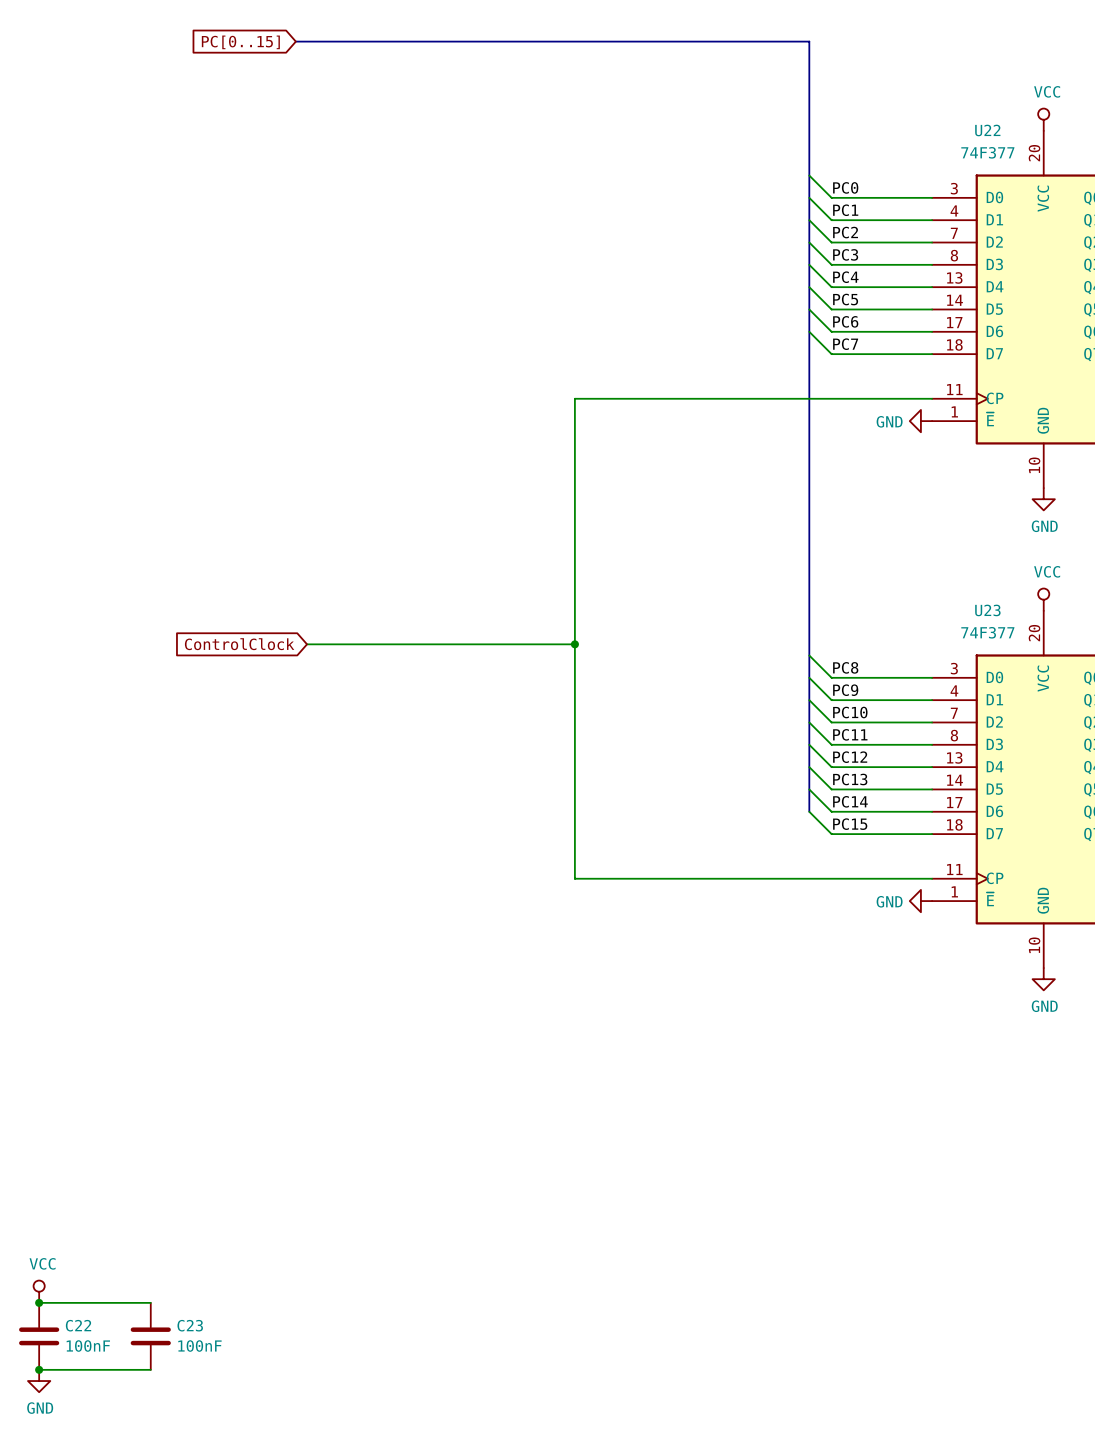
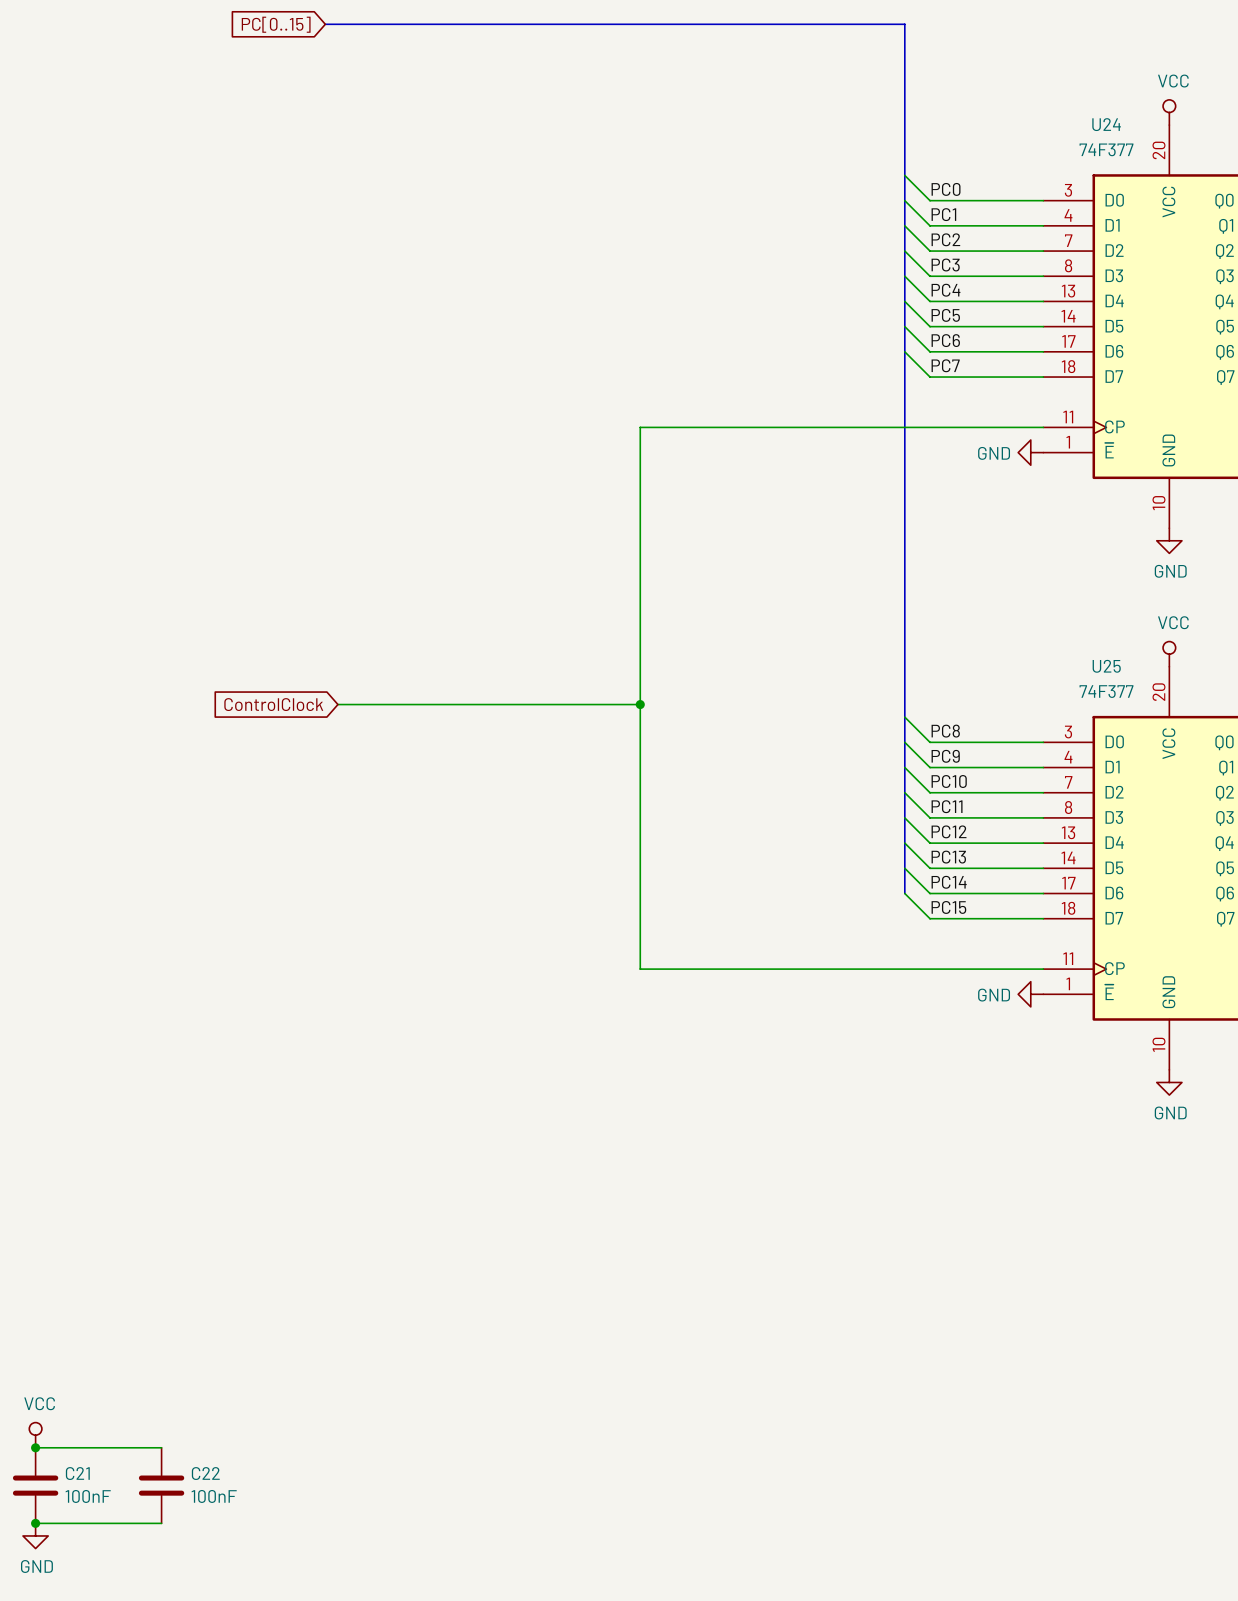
U22 name: U22 (987, 130) -> U24 (1106, 124)
U23 name: U23 (987, 610) -> U25 (1106, 666)
C22 name: C22 (78, 1325) -> C21 (77, 1473)
C23 name: C23 (190, 1325) -> C22 (205, 1473)

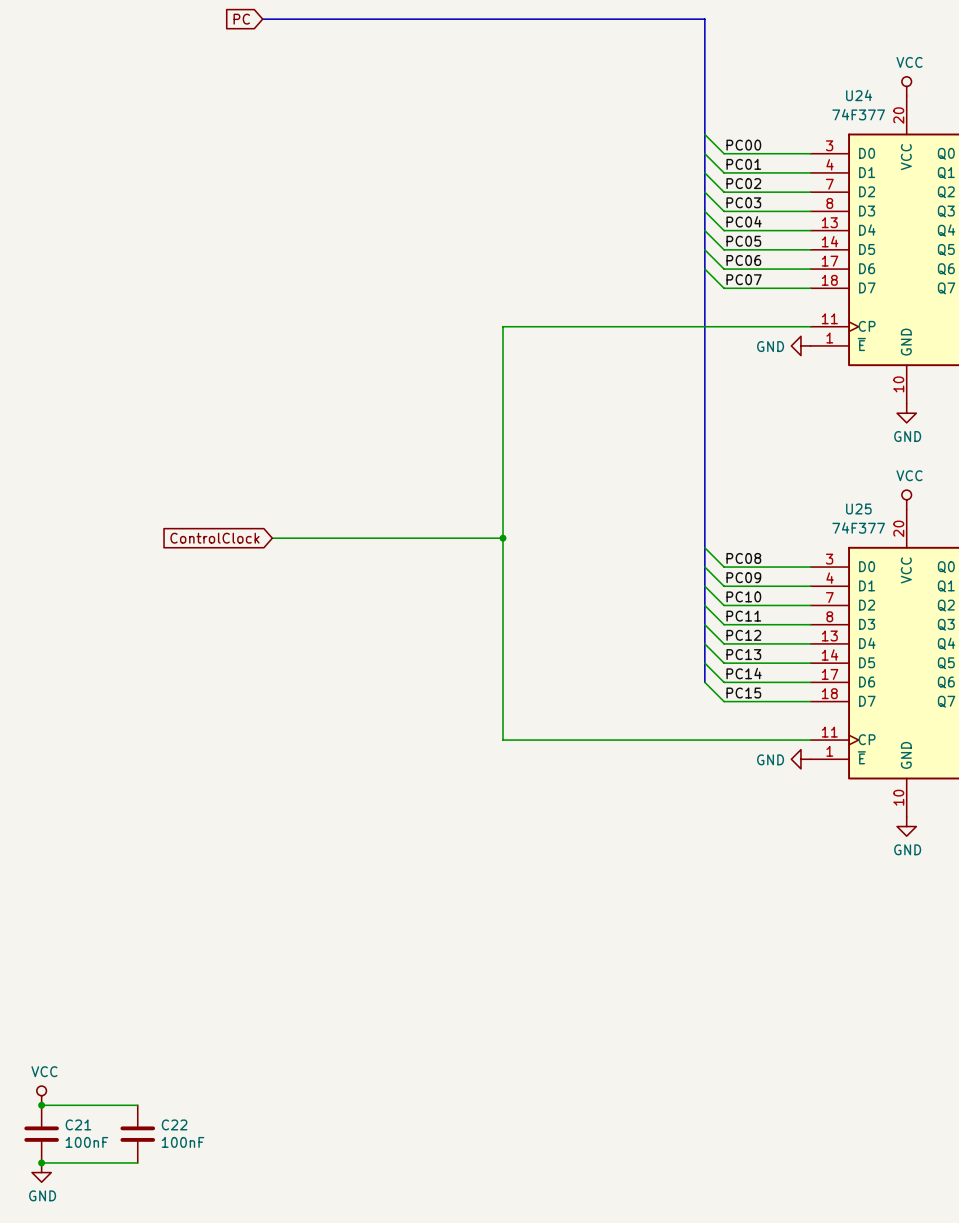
global label: PC[0..15] (276, 24) -> PC (241, 19)
label: PC0 (946, 189) -> PC00 (743, 145)
label: PC1 (943, 214) -> PC01 (743, 164)
label: PC2 (945, 239) -> PC02 (743, 183)
label: PC3 (945, 265) -> PC03 (743, 202)
label: PC4 (945, 290) -> PC04 (744, 221)
label: PC5 (945, 315) -> PC05 (743, 241)
label: PC6 (945, 340) -> PC06 (743, 260)
label: PC7 (945, 365) -> PC07 (744, 279)
label: PC8 (945, 731) -> PC08 (743, 558)
label: PC9 (945, 756) -> PC09 (743, 577)

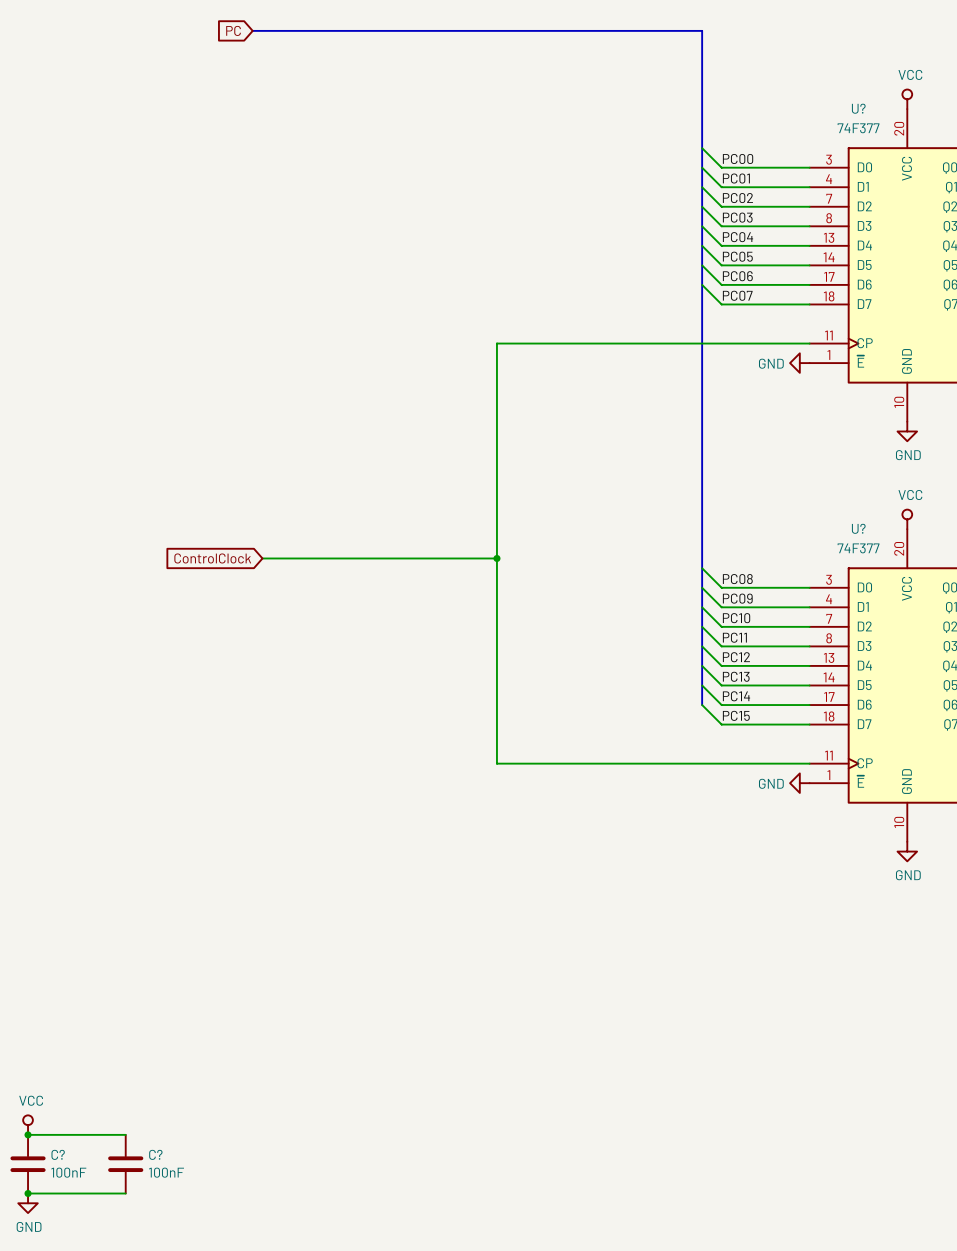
U24 name: U24 (859, 95) -> U? (858, 108)
U25 name: U25 (858, 509) -> U? (858, 528)
C21 name: C21 (78, 1124) -> C? (58, 1154)
C22 name: C22 (174, 1124) -> C? (155, 1154)

